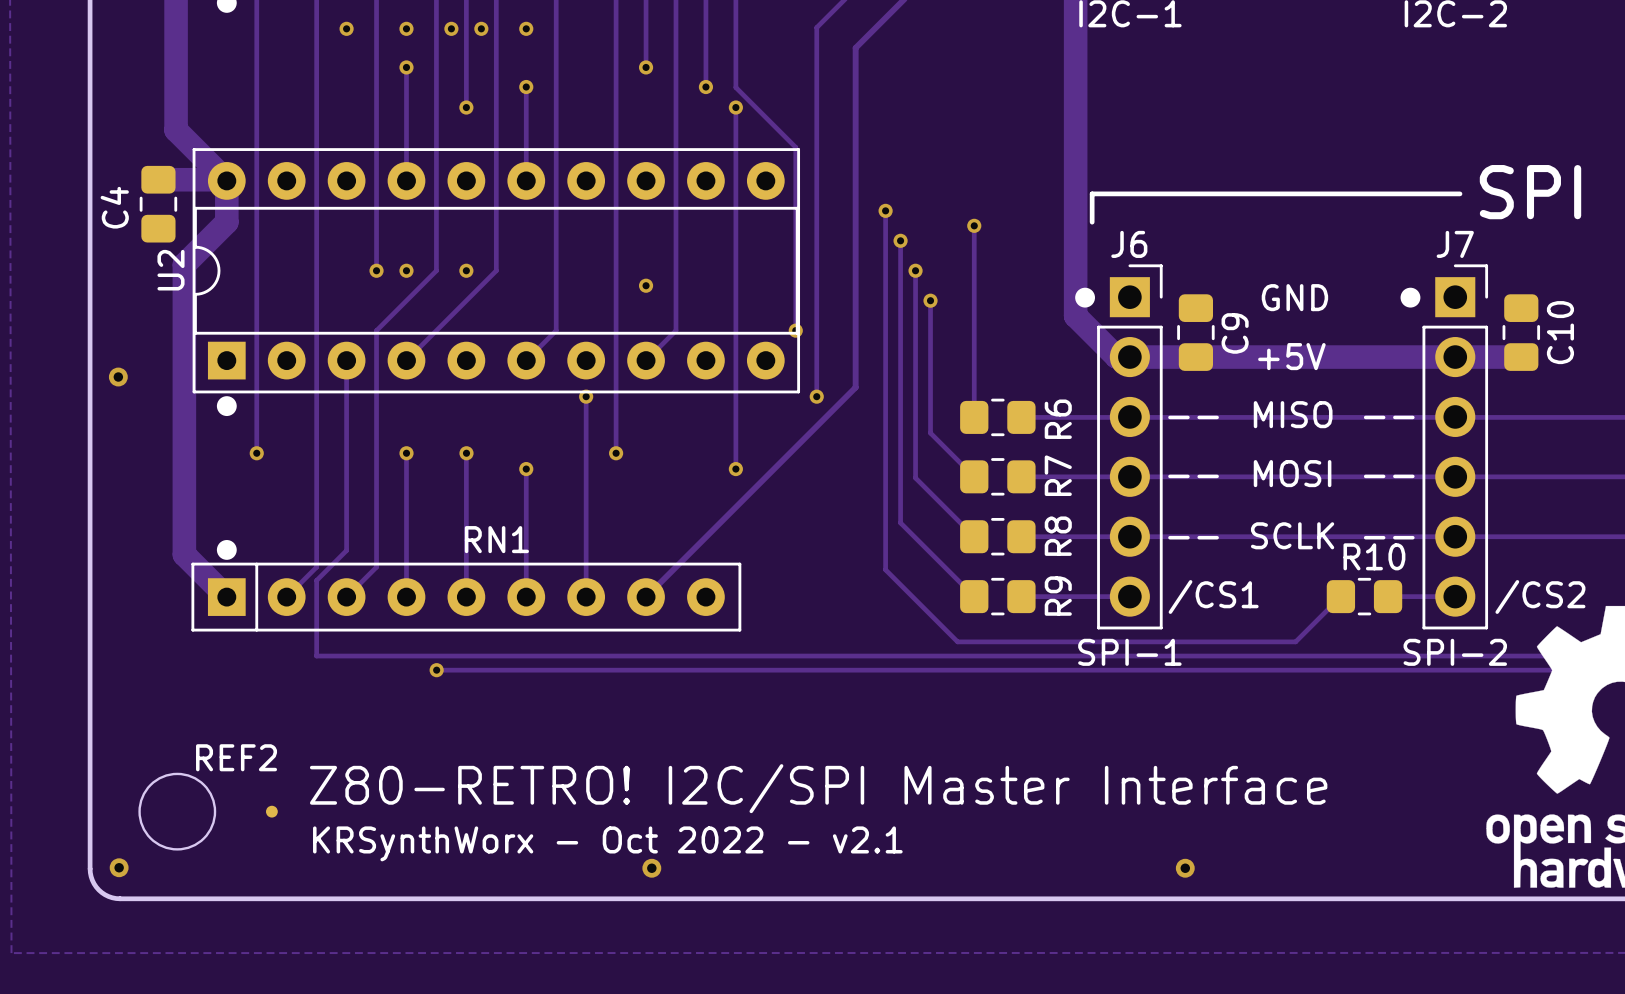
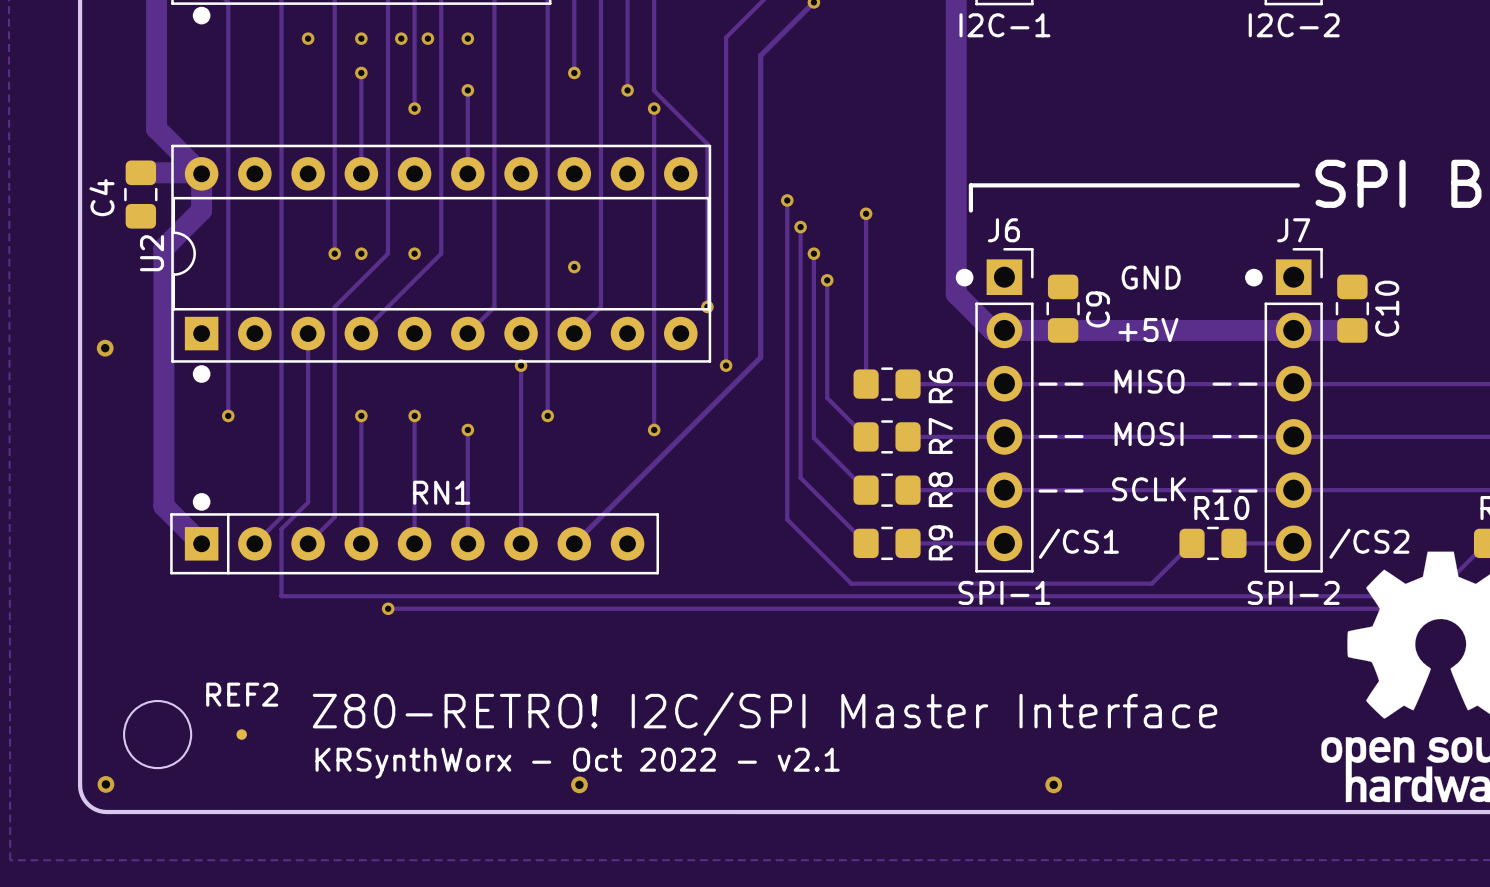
REF2 name position: REF2 (236, 757) -> REF2 (242, 694)
text position: Z80-RETRO! I2C/SPI Master Interface (818, 788) -> Z80-RETRO! I2C/SPI Master Interface (765, 714)
text position: KRSynthWorx - Oct 2022 - v2.1 (607, 843) -> KRSynthWorx - Oct 2022 - v2.1 (577, 763)

